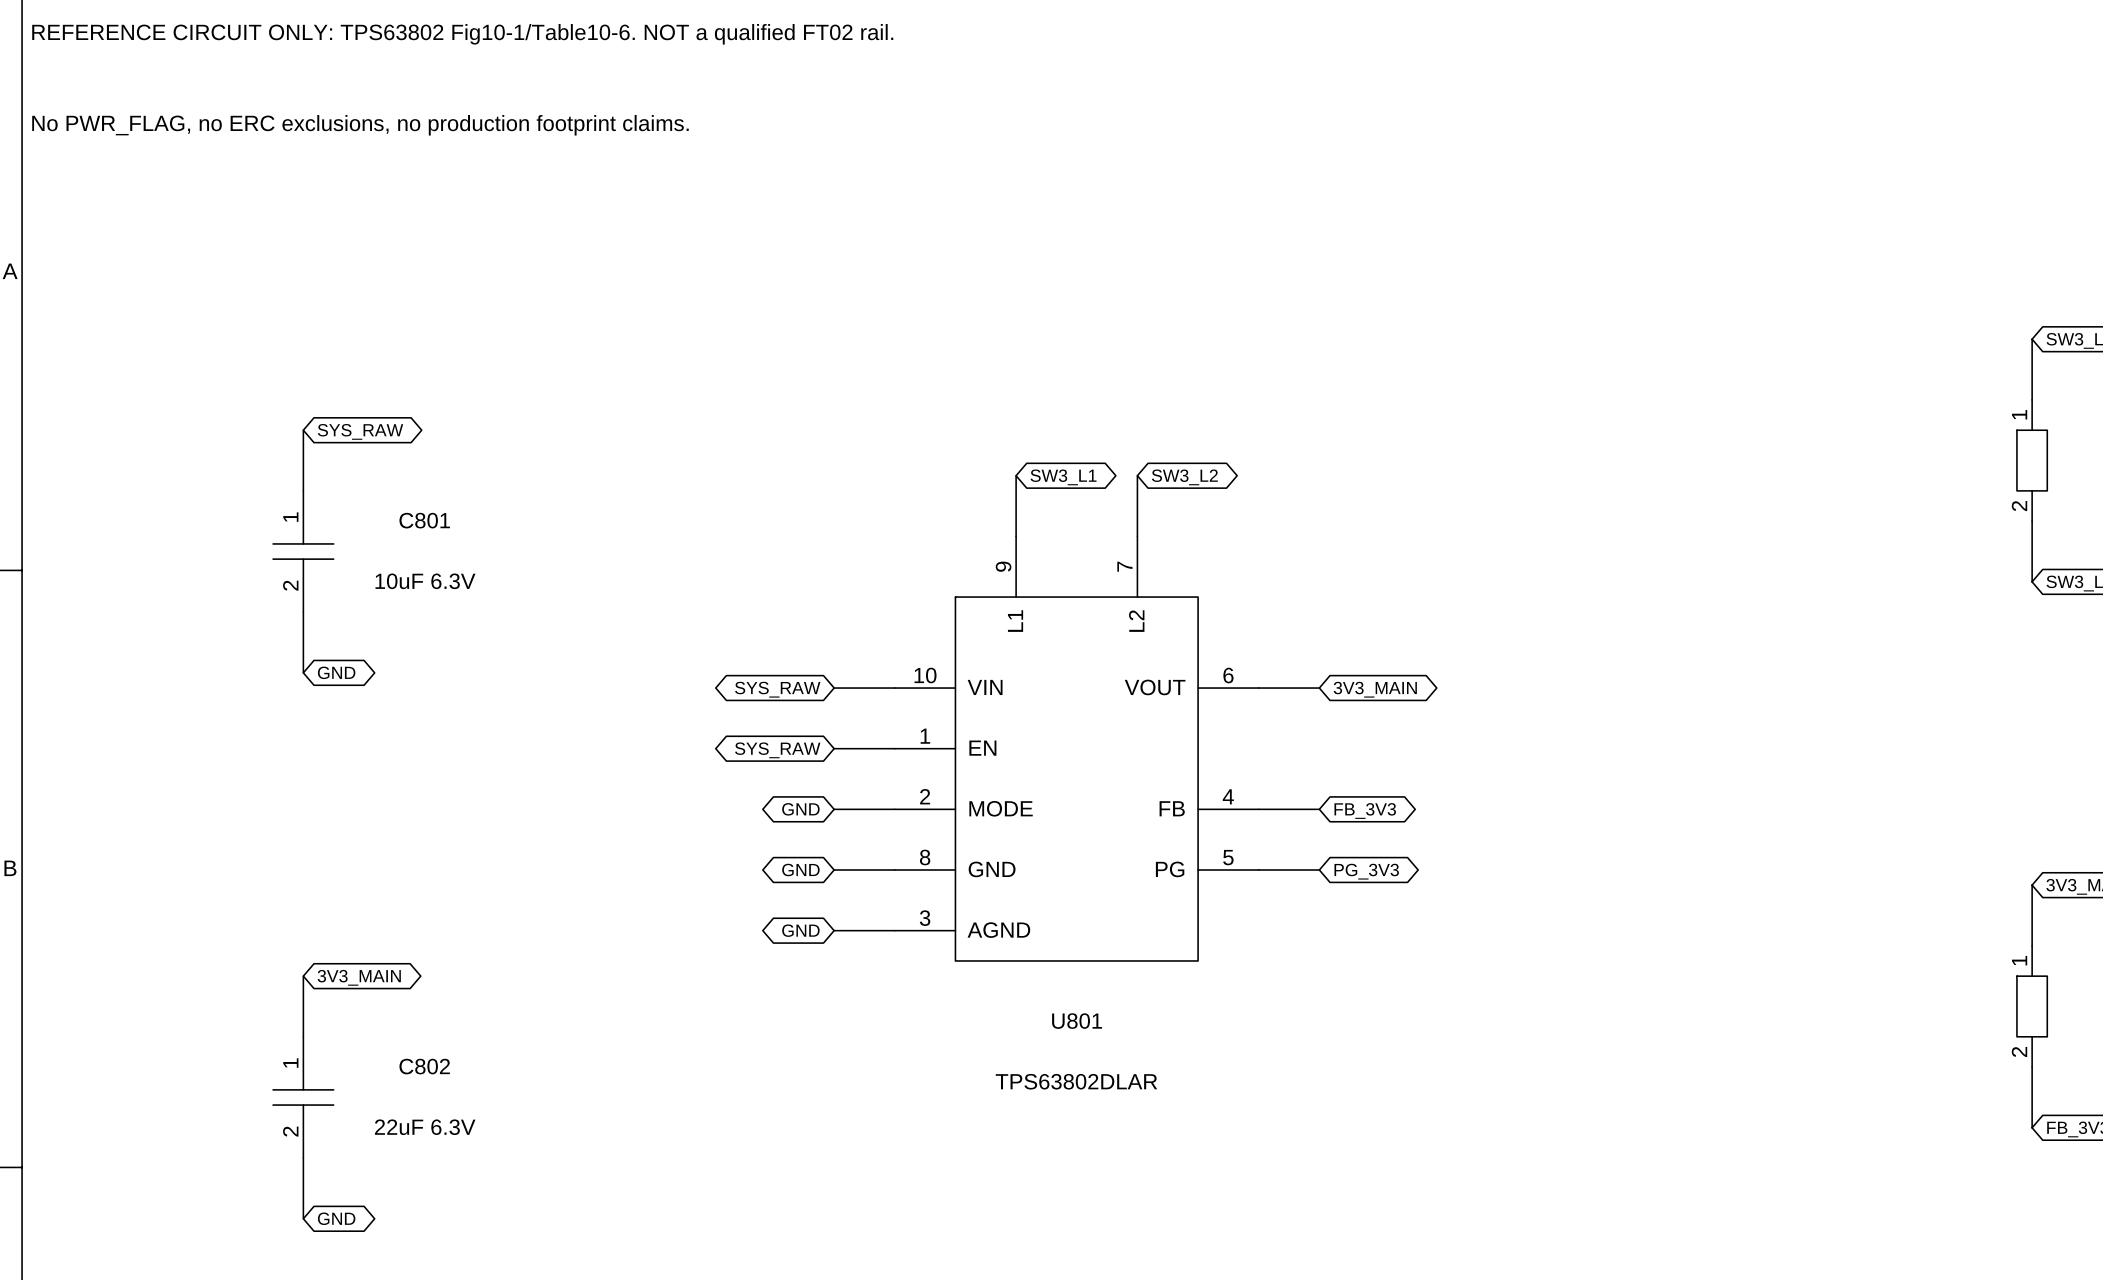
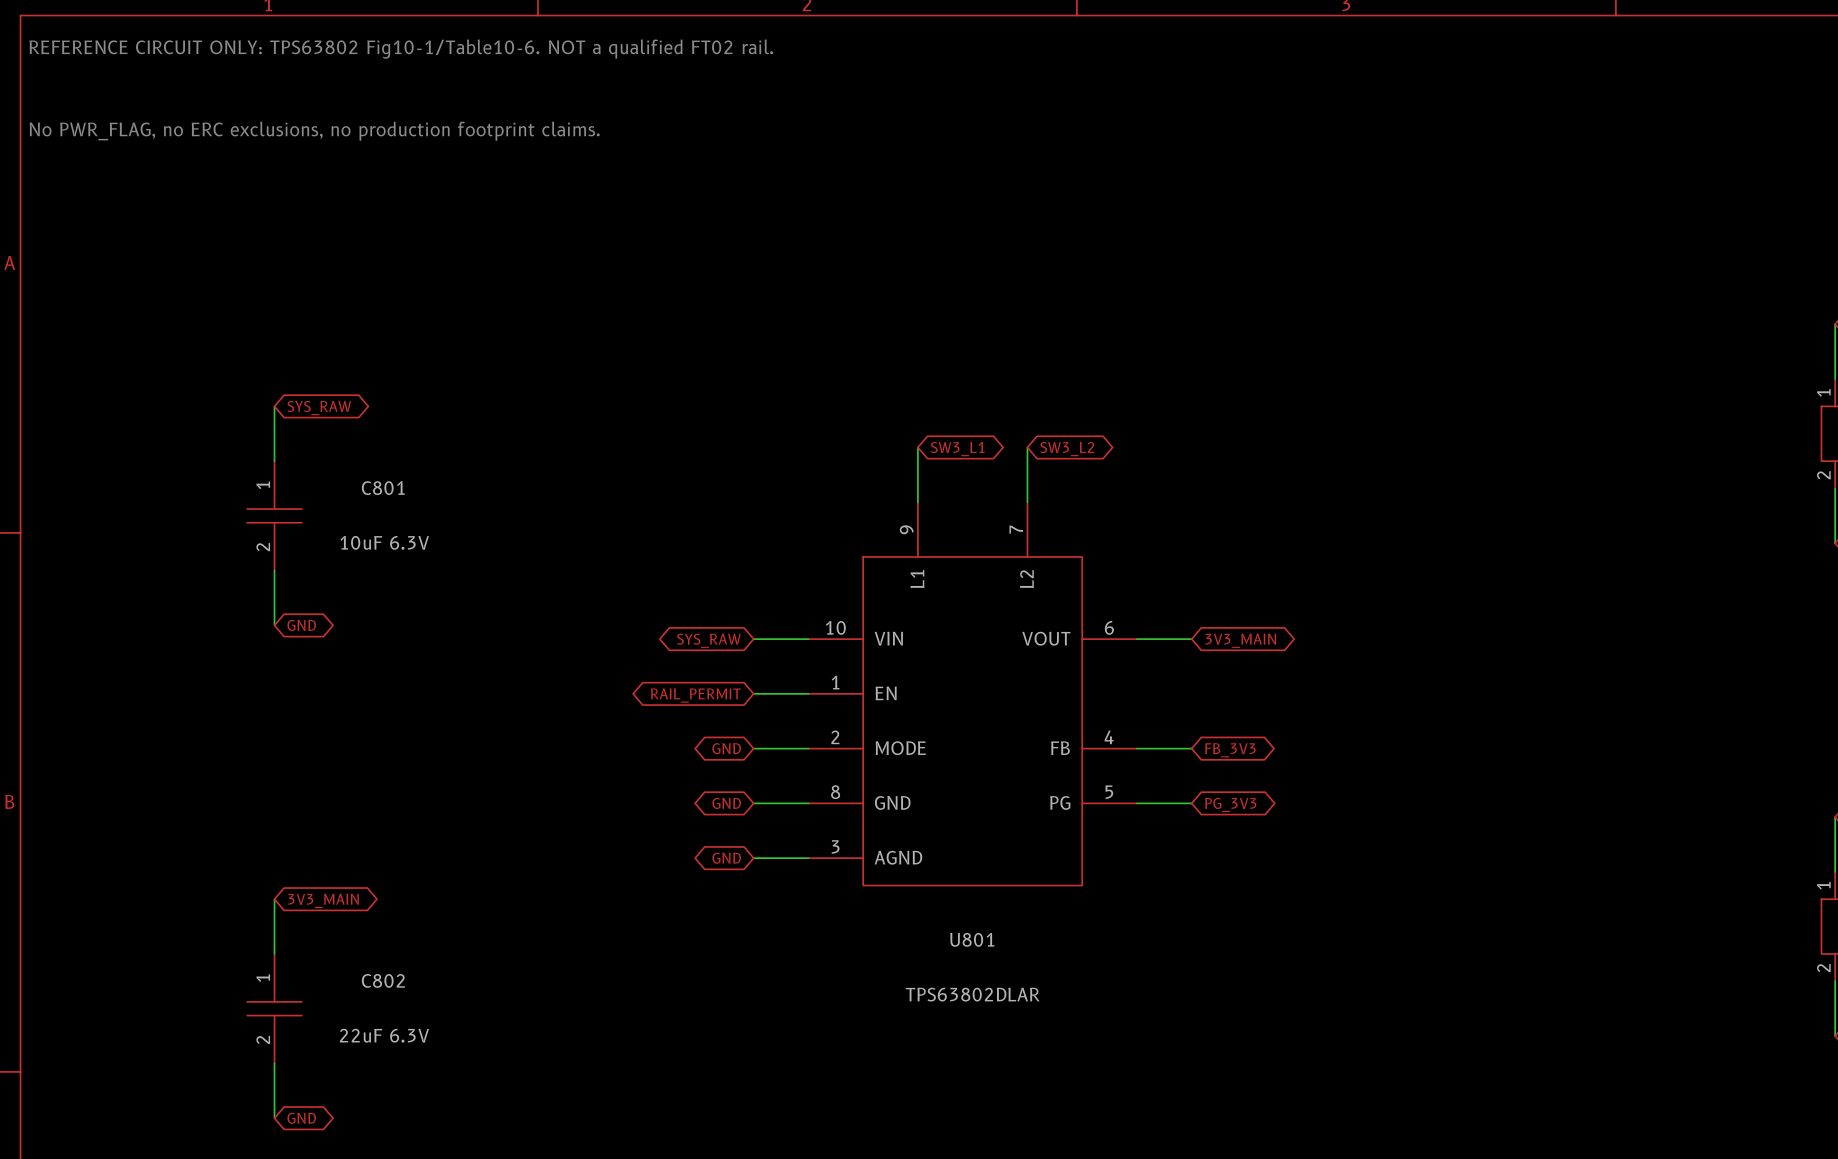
global label: SYS_RAW (777, 750) -> RAIL_PERMIT (695, 695)

